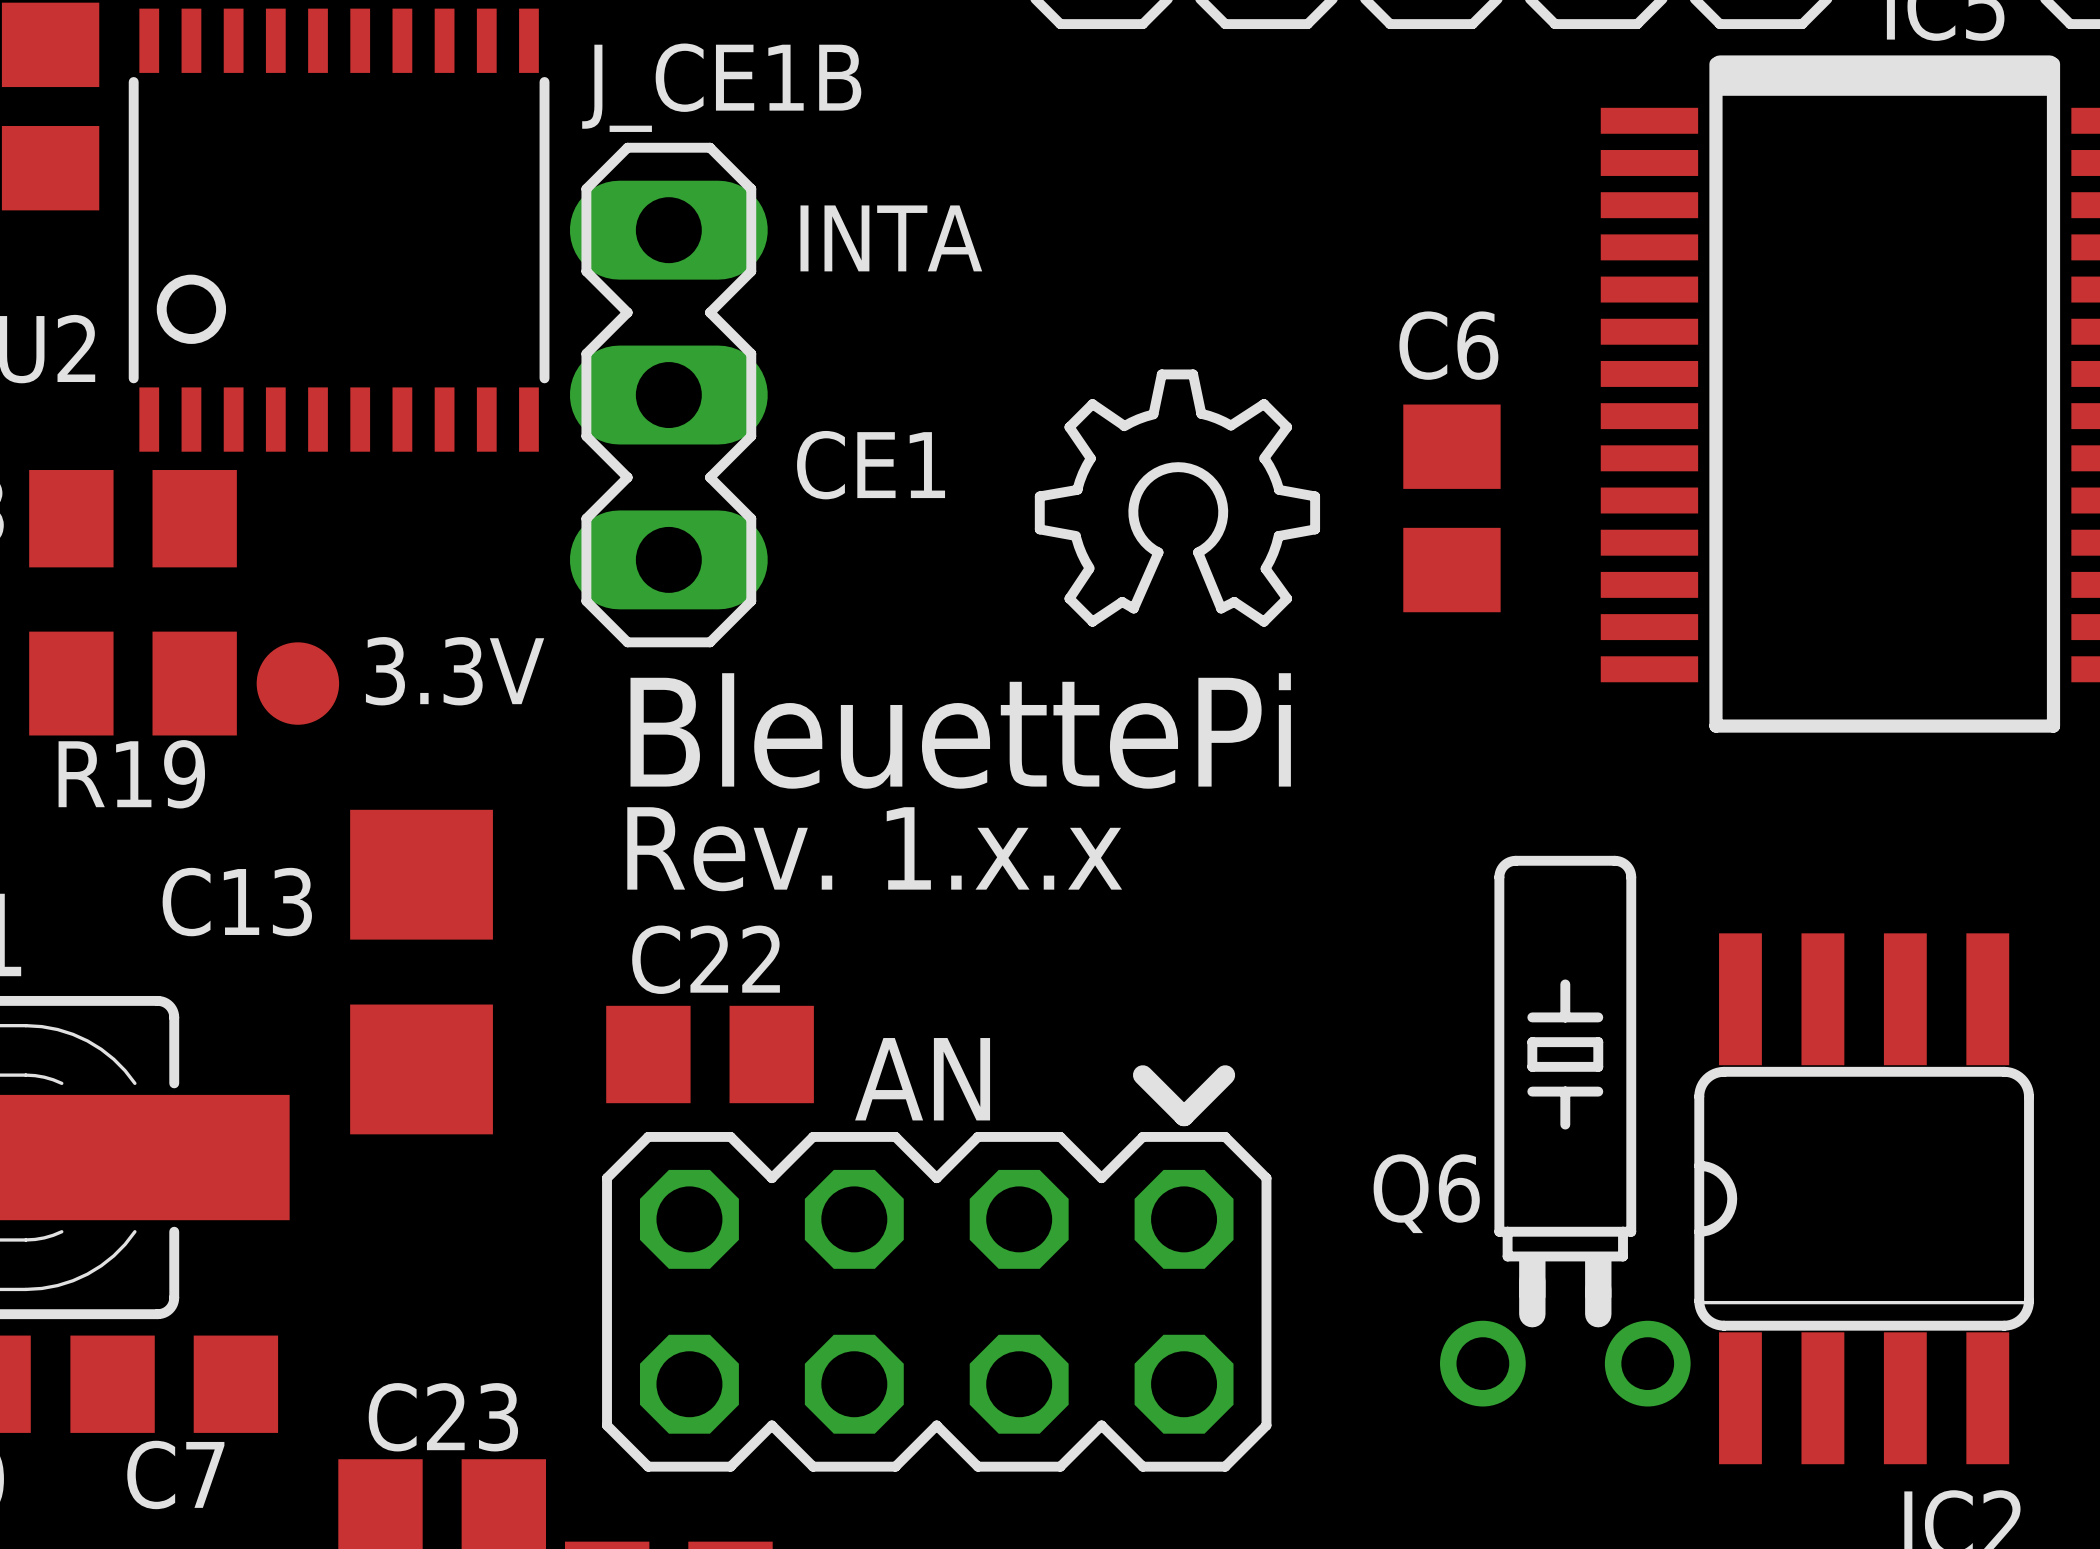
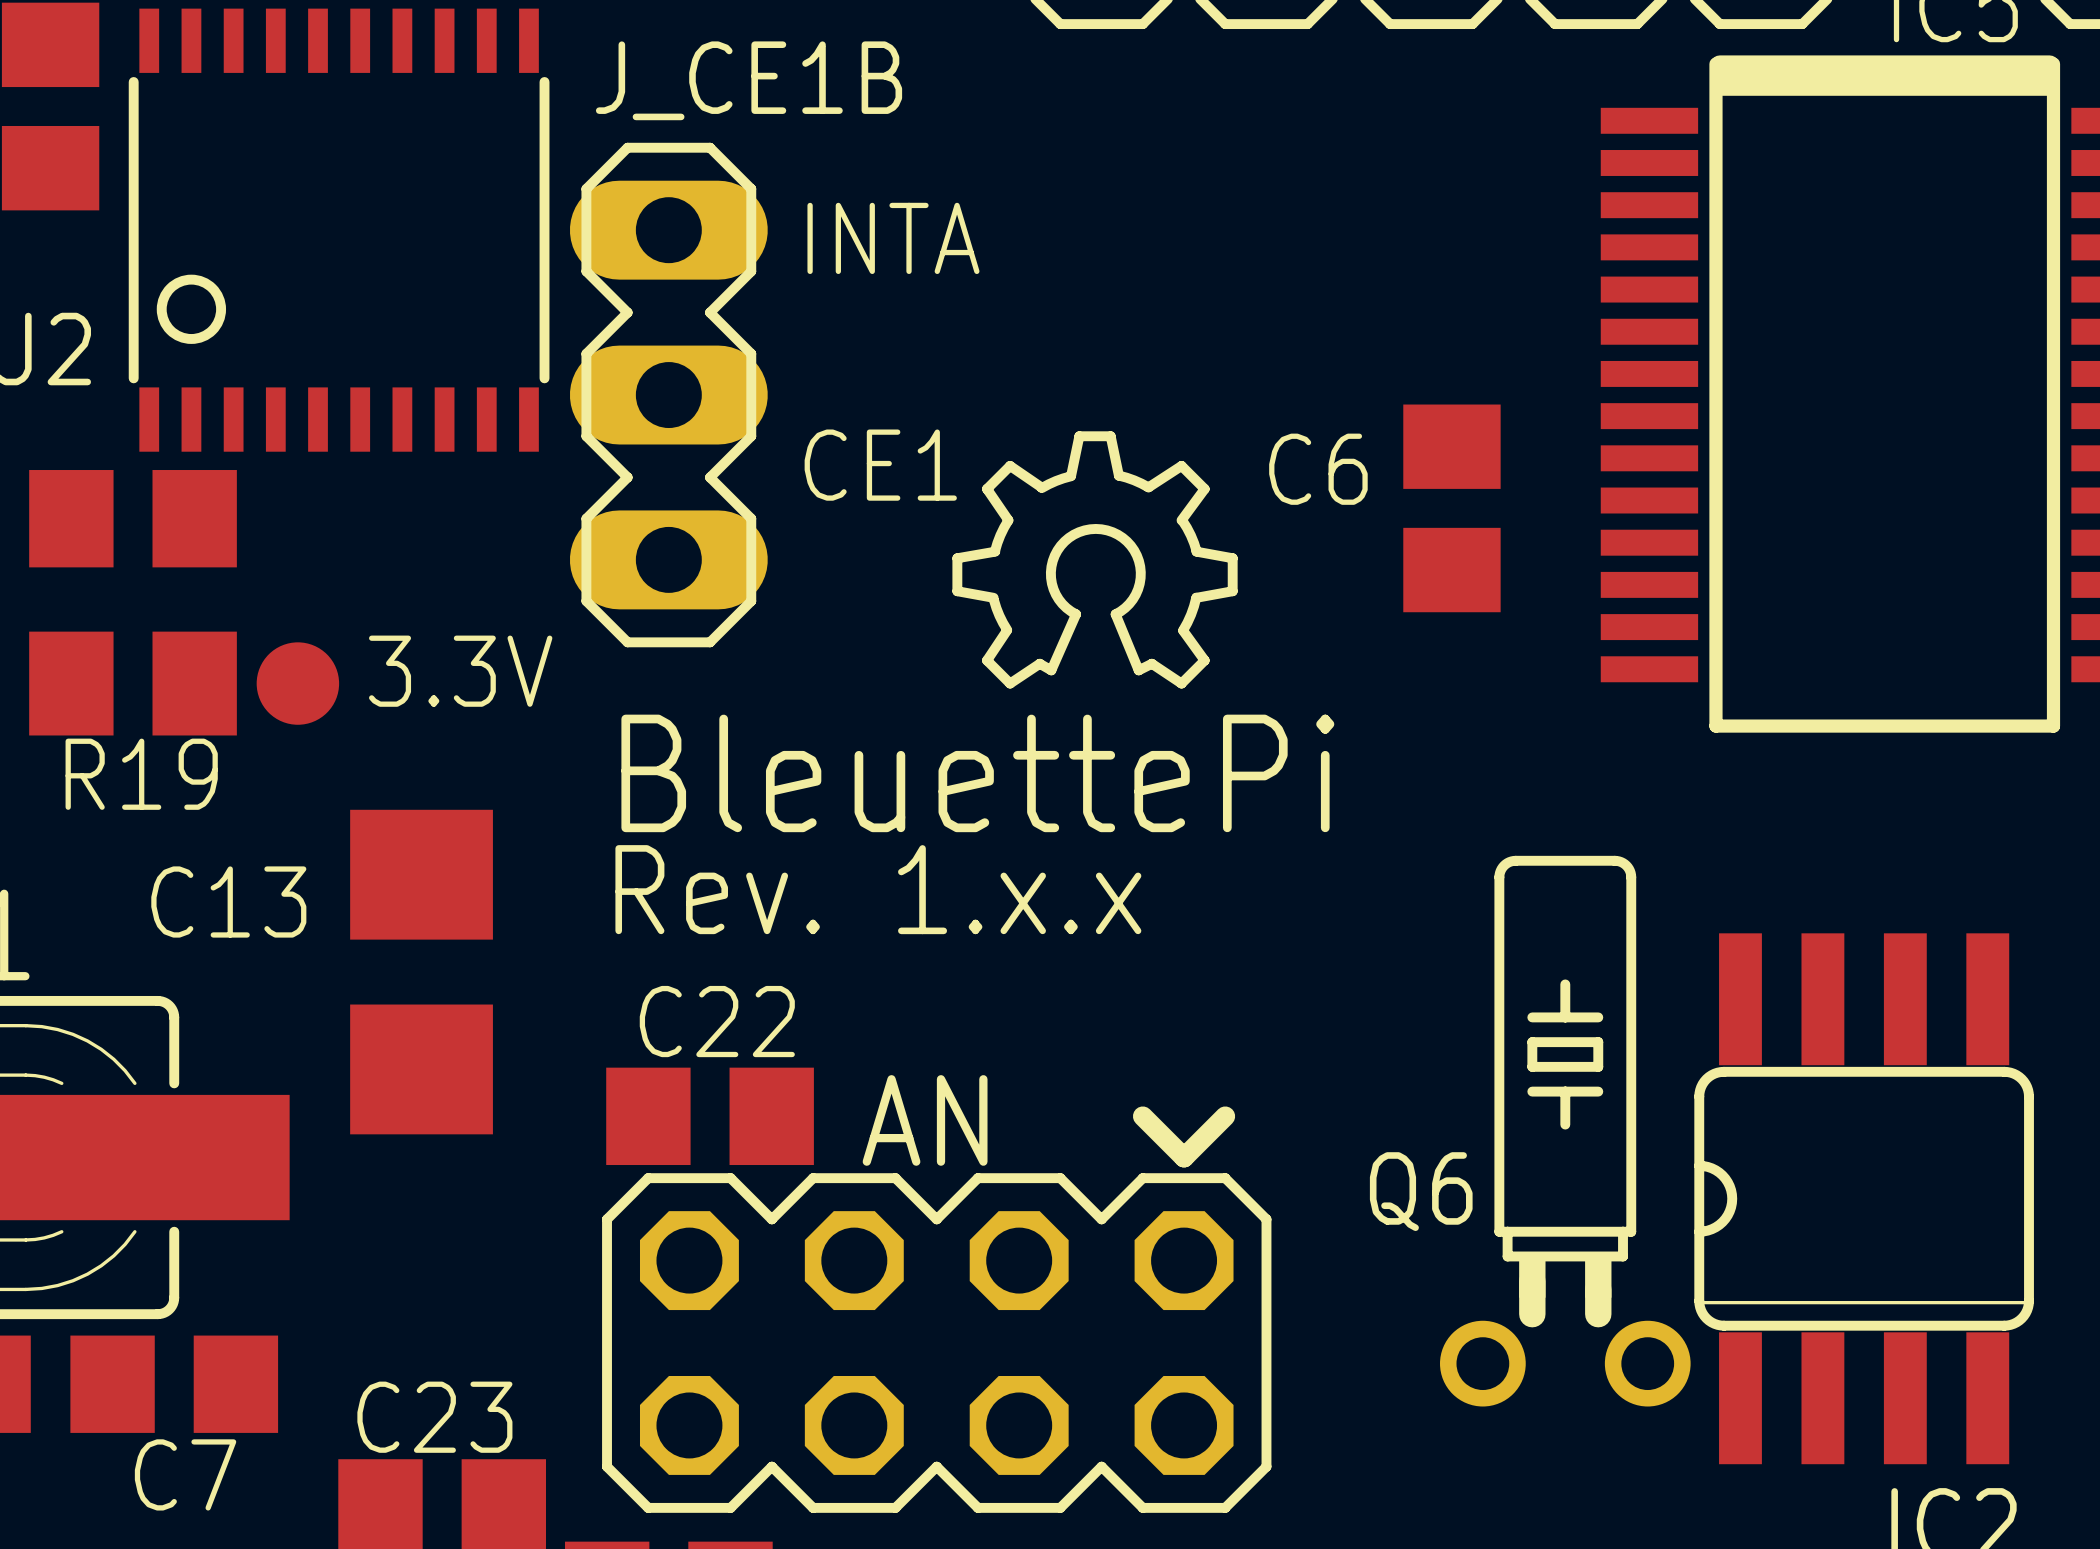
C6 name position: C6 (1448, 345) -> C6 (1318, 469)
drawing position: (1177, 498) -> (1095, 559)
text position: BleuettePi (960, 730) -> BleuettePi (977, 773)
text position: Rev. 1.x.x (874, 849) -> Rev. 1.x.x (878, 889)
C22 position: (710, 1054) -> (710, 1116)
line: (1142, 1075) (1184, 1116) (1225, 1075) -> (1142, 1116) (1184, 1157) (1225, 1116)
AN position: (936, 1301) -> (936, 1343)

